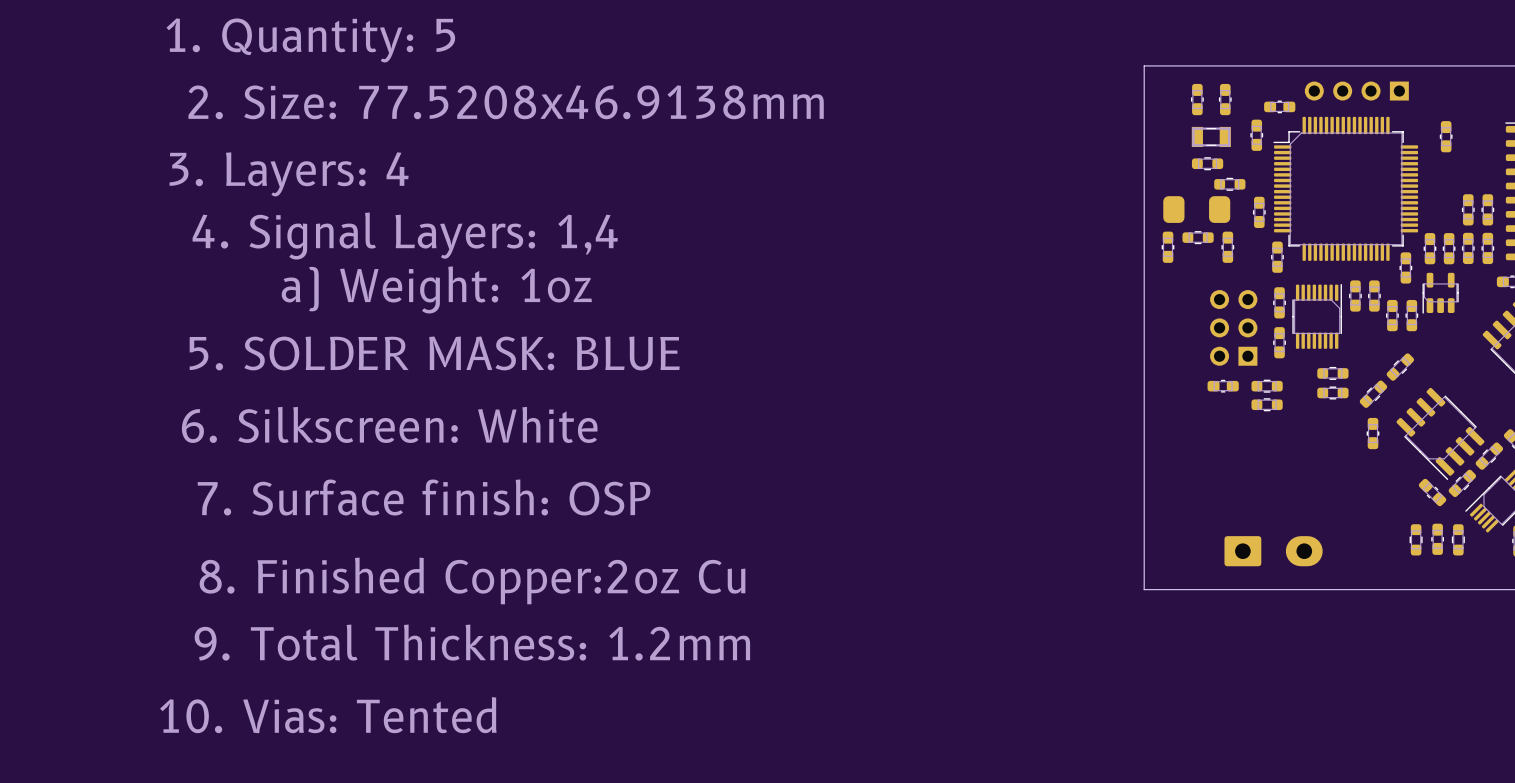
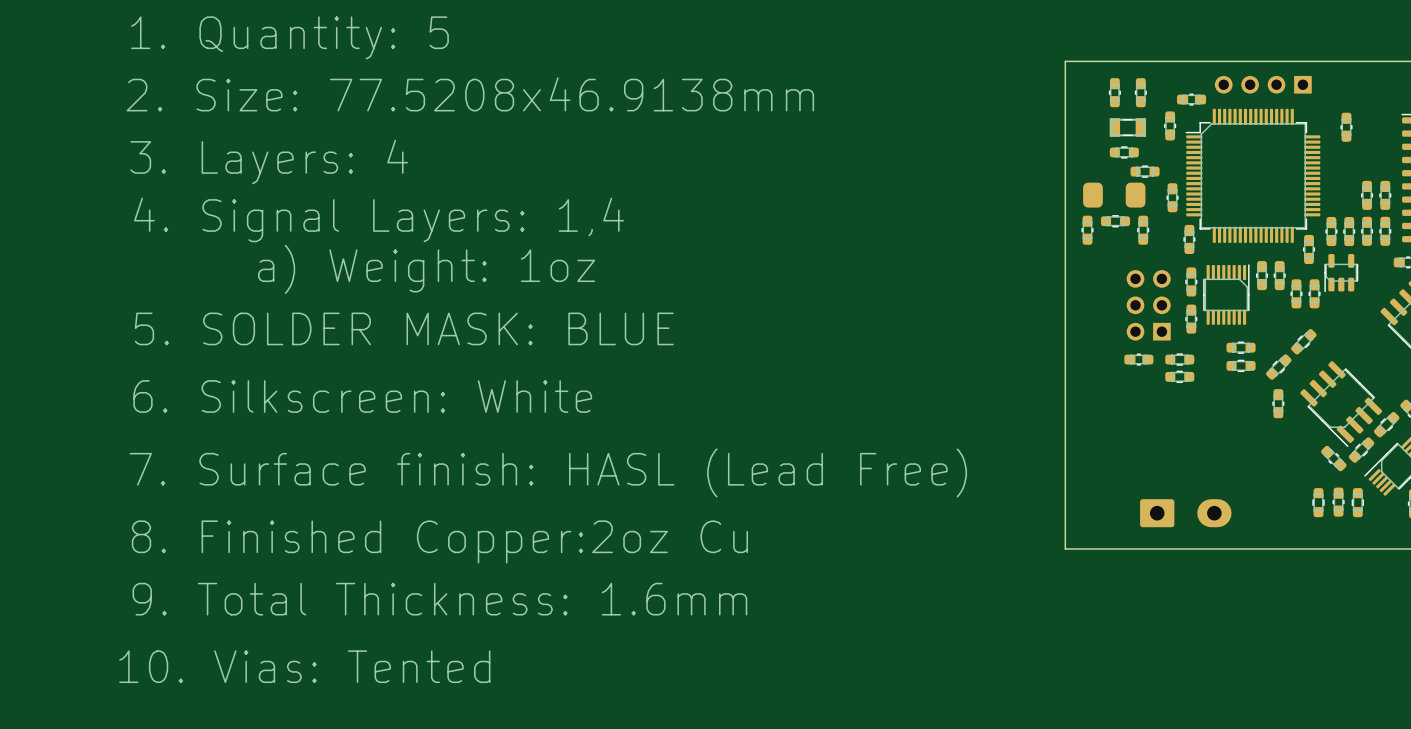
text: 7. Surface finish: OSP (424, 497) -> 7. Surface finish: HASL (Lead Free) (548, 472)
text: 9. Total Thickness: 1.2mm (472, 642) -> 9. Total Thickness: 1.6mm (439, 599)

